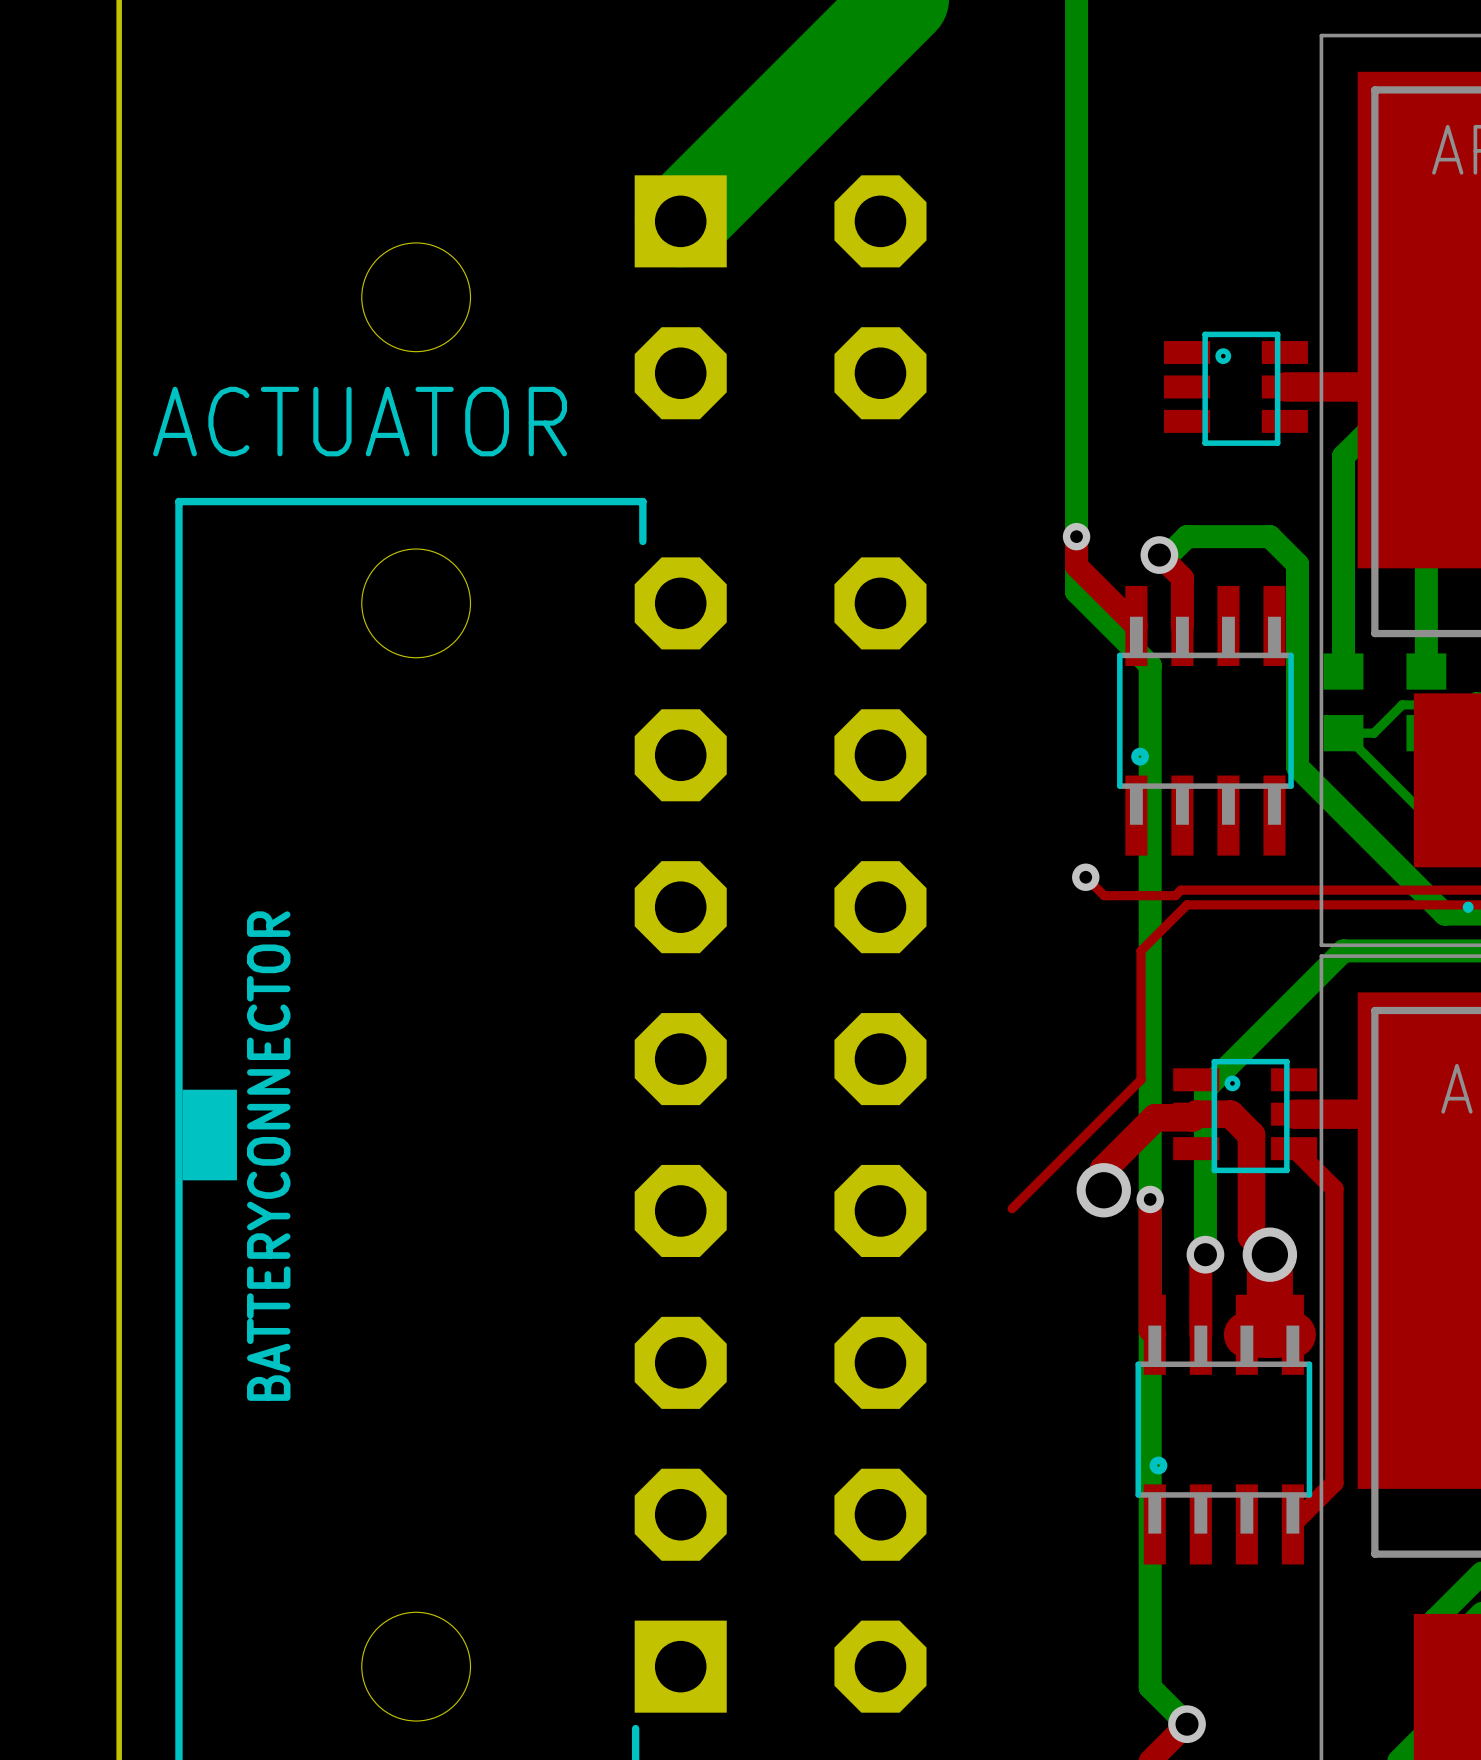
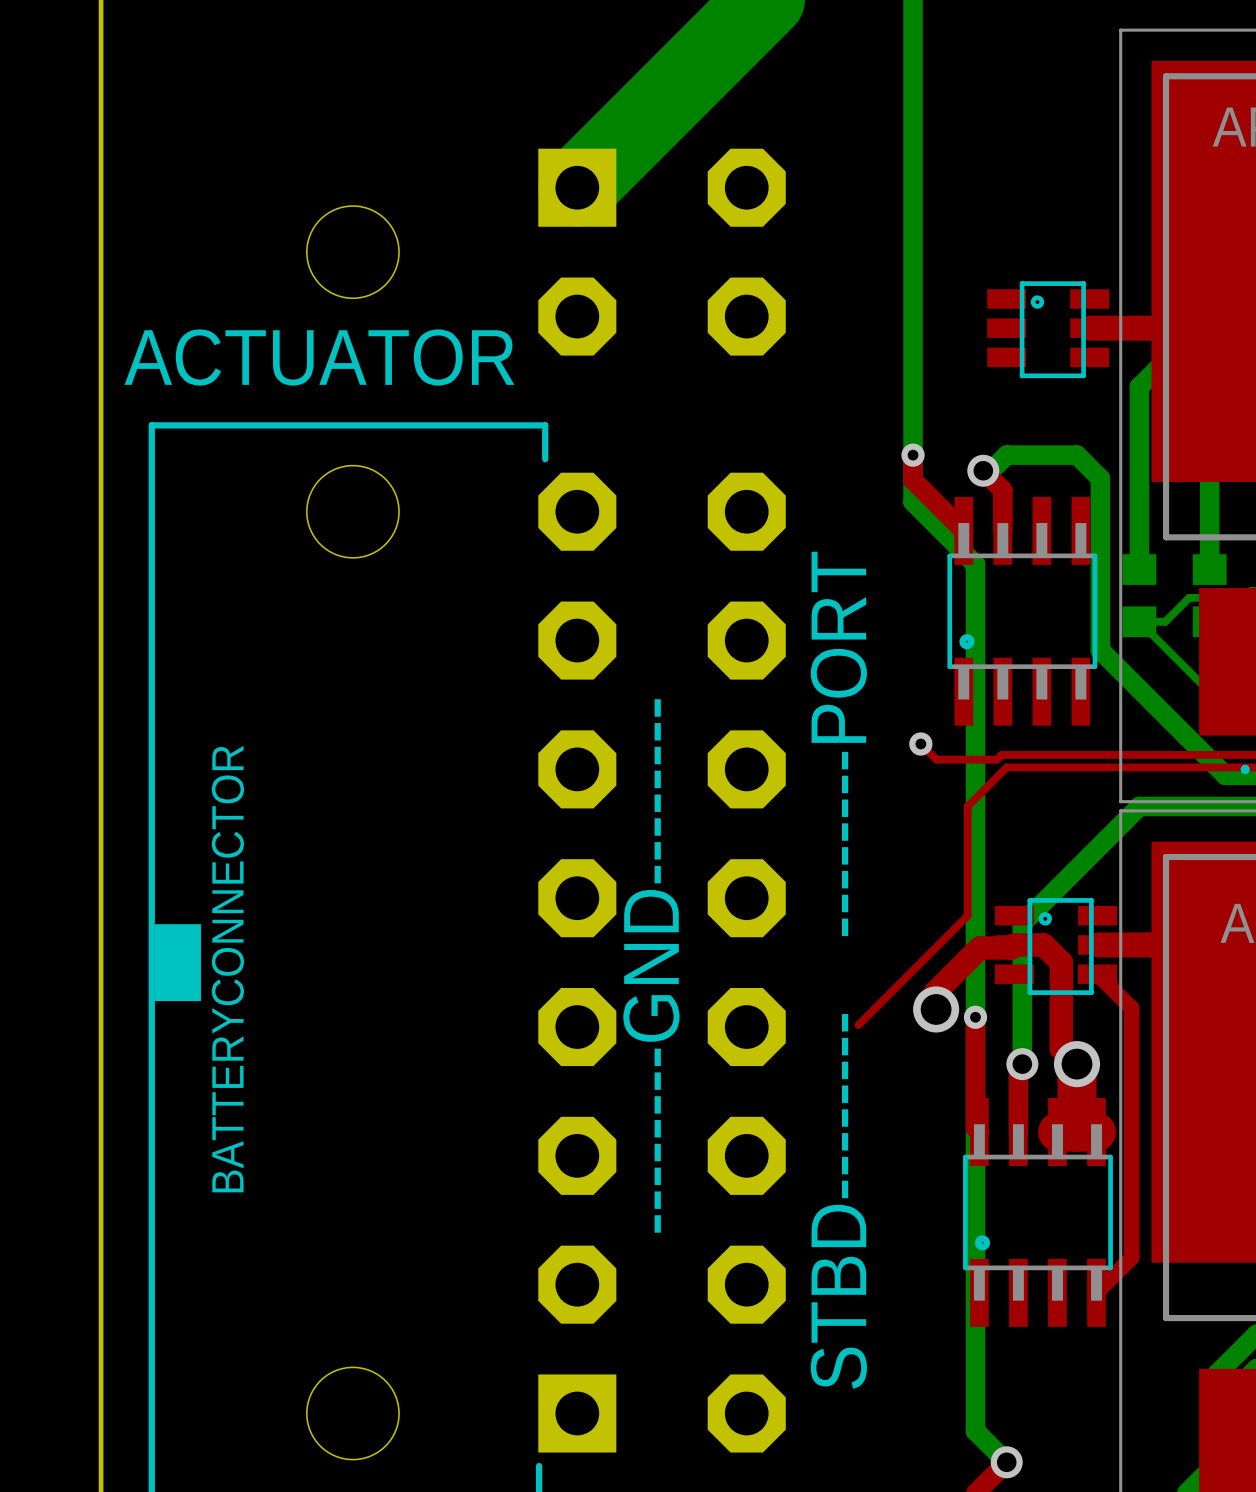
text: none -> --------PORT (838, 743)
text: none -> --------GND-------- (651, 965)
text: none -> STBD-------- (838, 1201)

